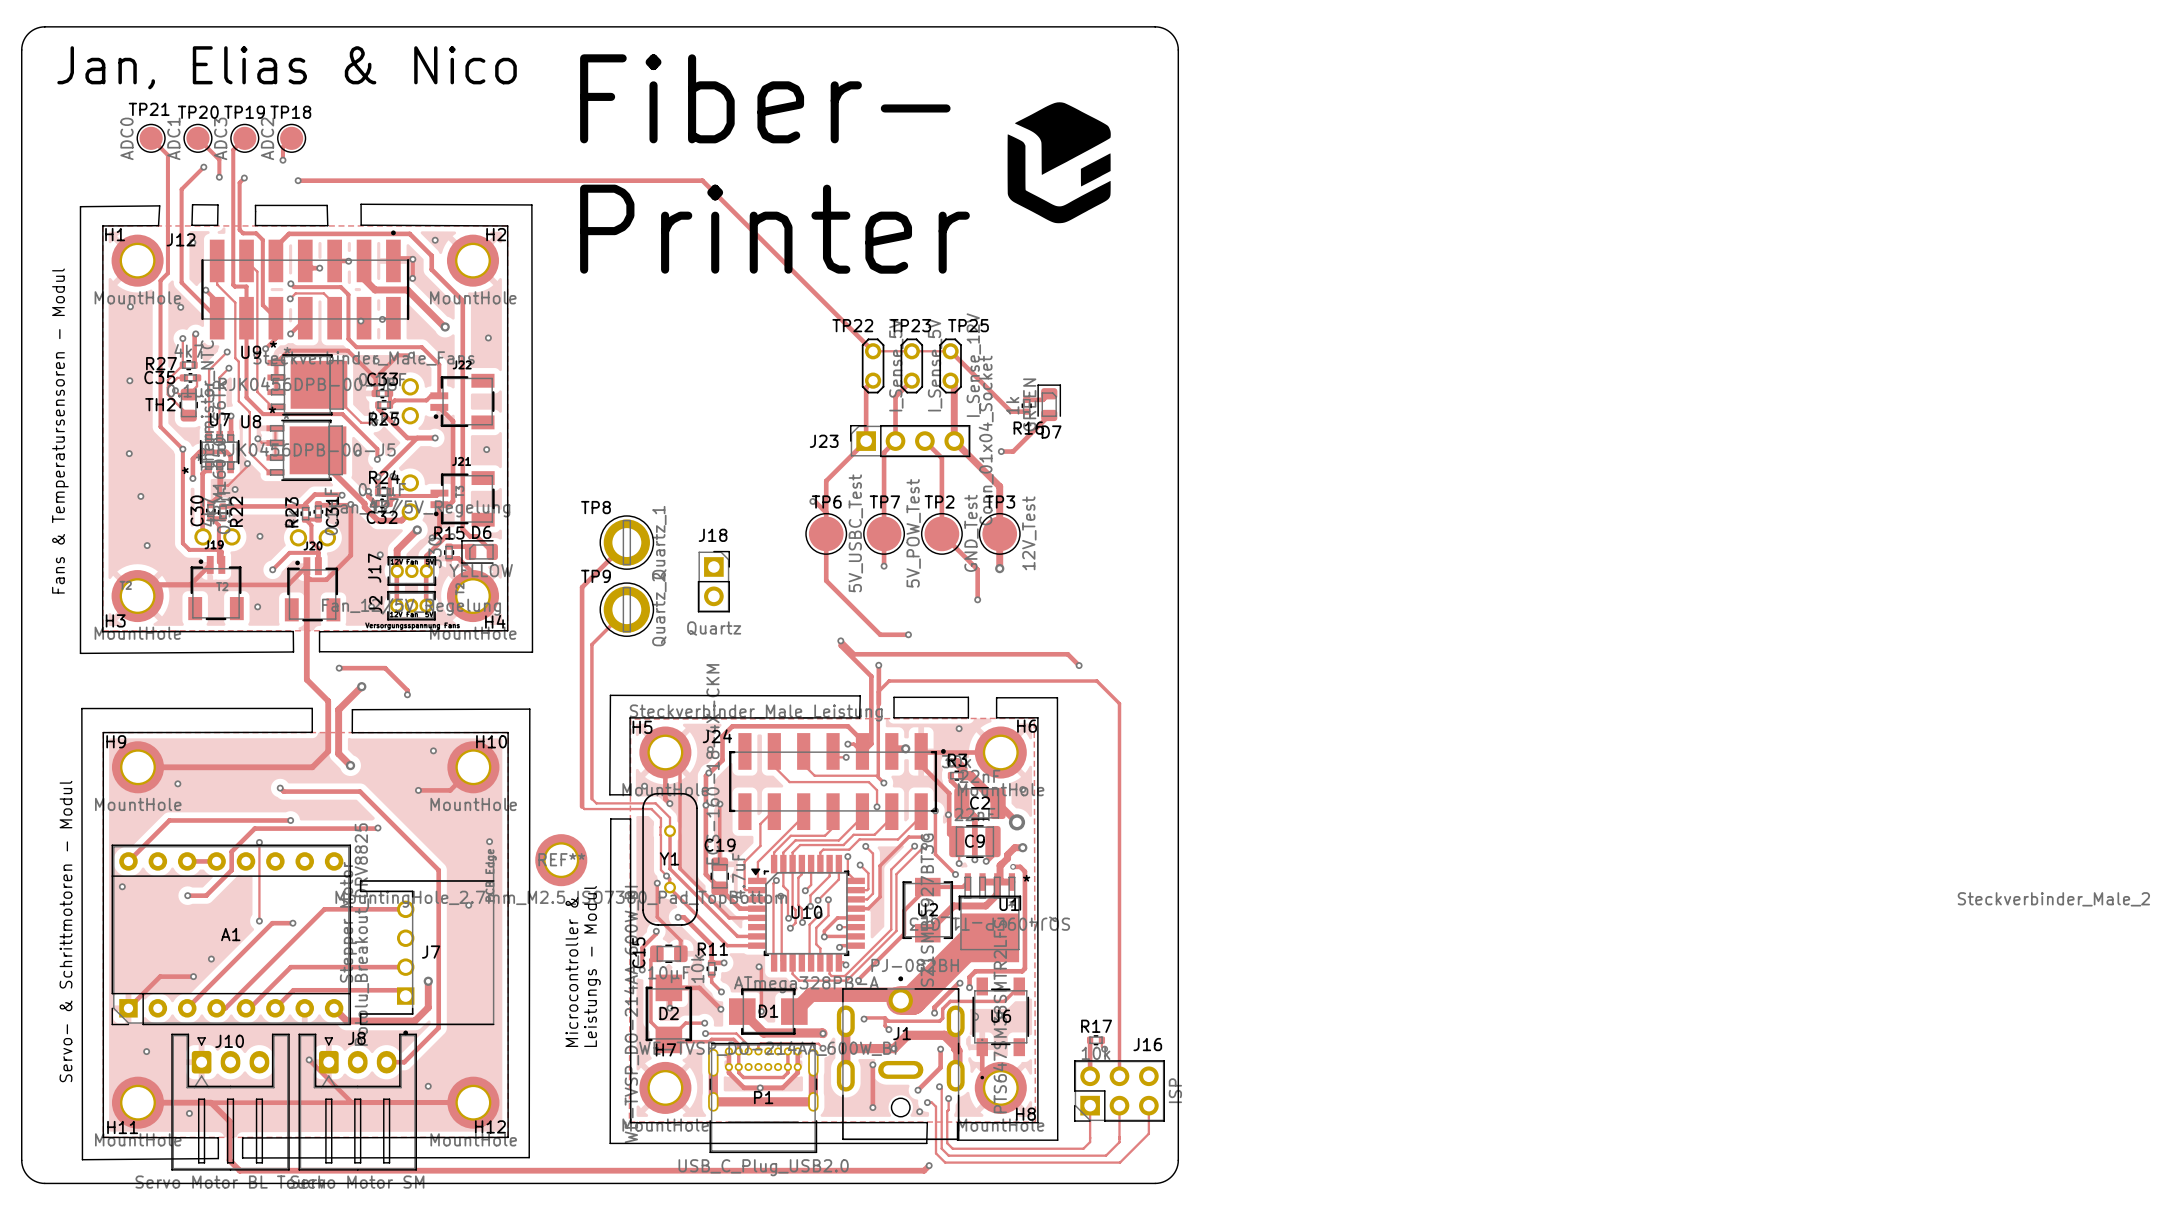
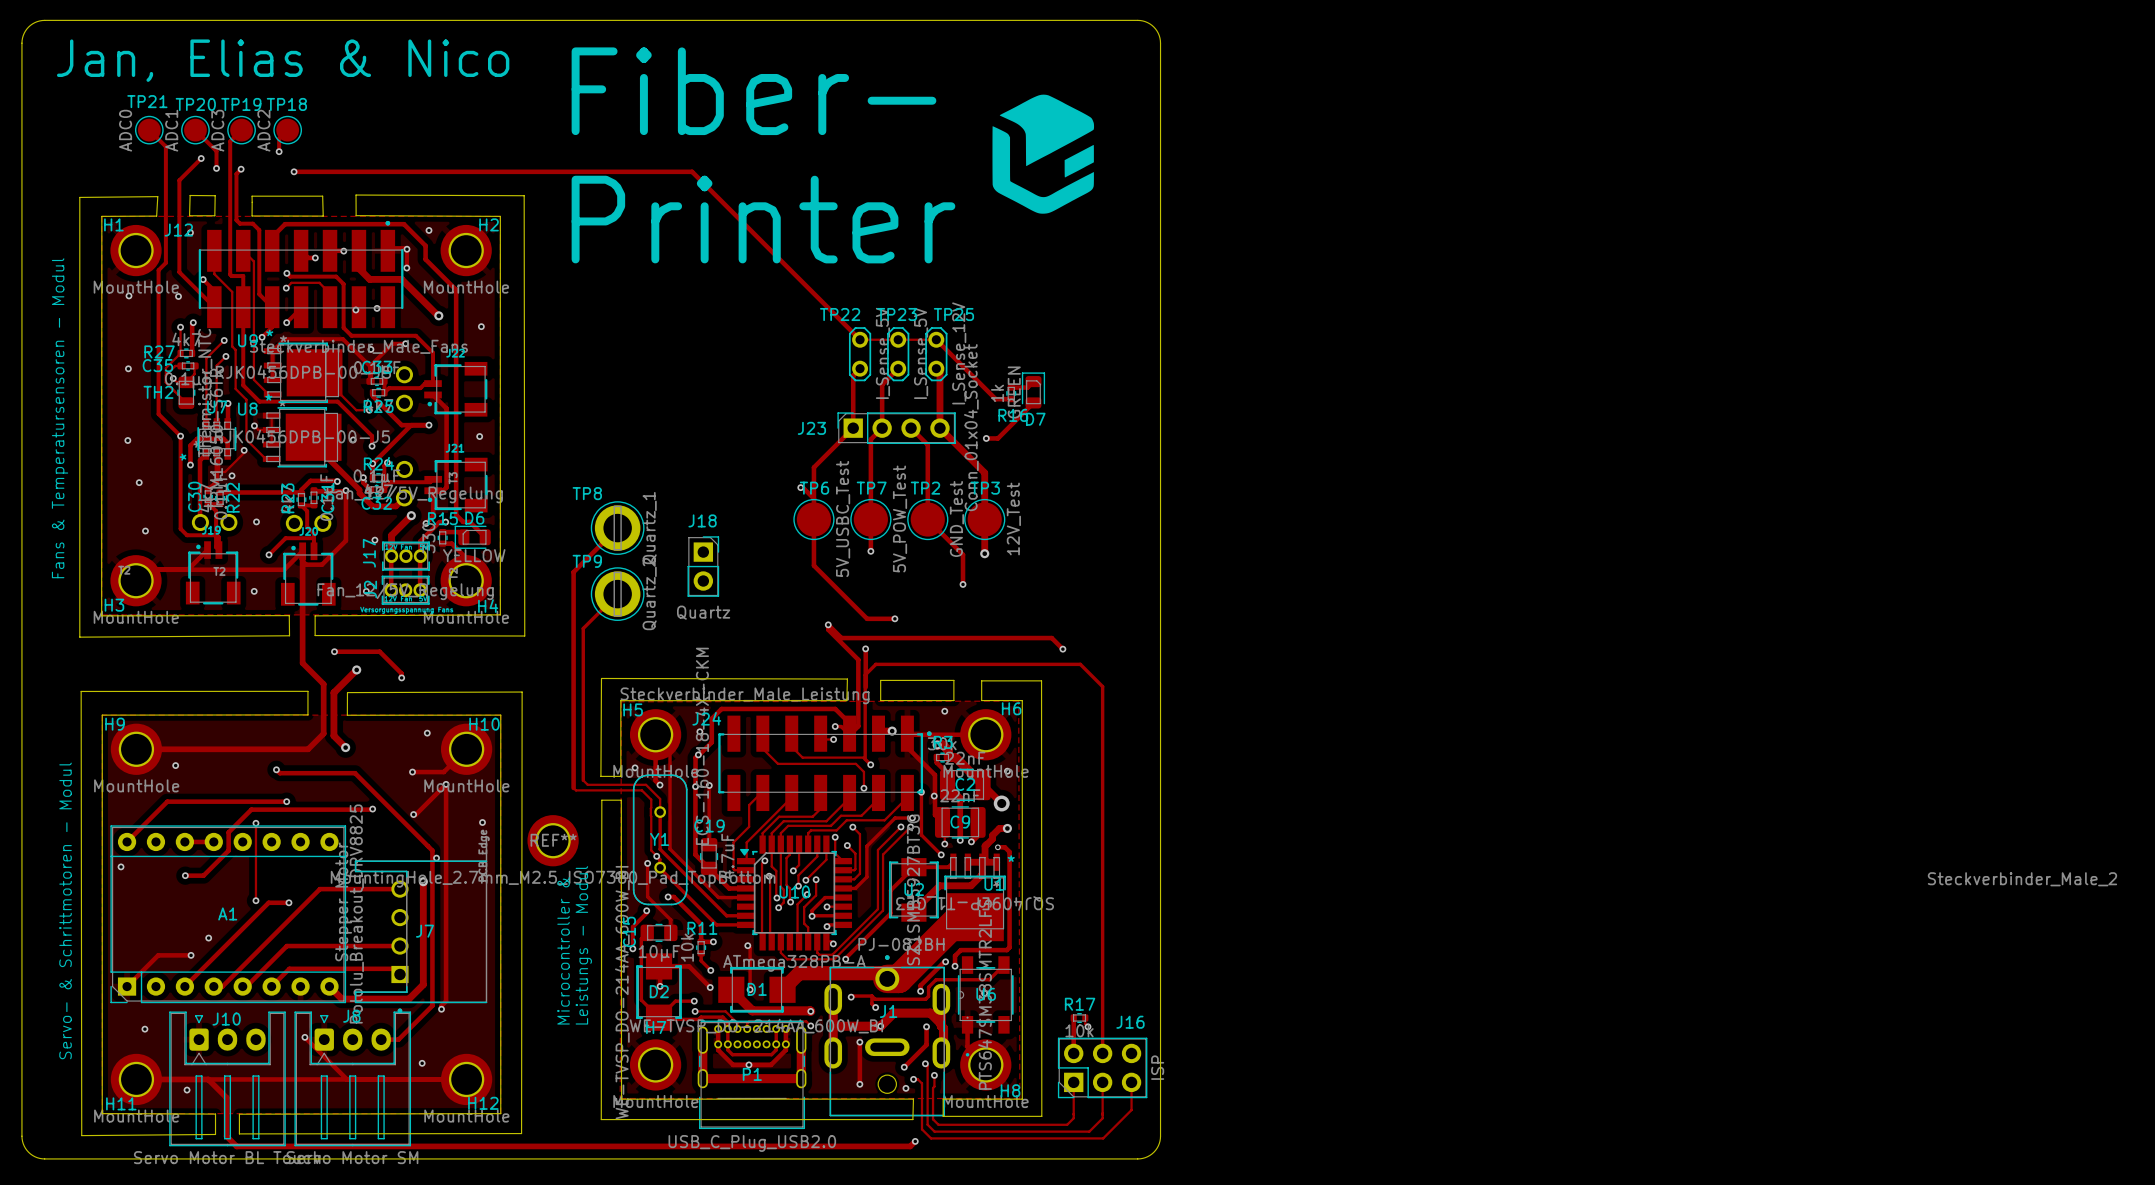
via: none -> (446, 784)
track: none -> (413, 814) (415, 814) (446, 784) (446, 1001) (441, 1005) (441, 1009)
via: none -> (413, 814)
via: none -> (423, 881)
via position: (468, 905) -> (436, 858)
track: (428, 981) (428, 1007) -> (423, 881) (422, 985)
via: (428, 981) -> none
via: none -> (441, 1009)

